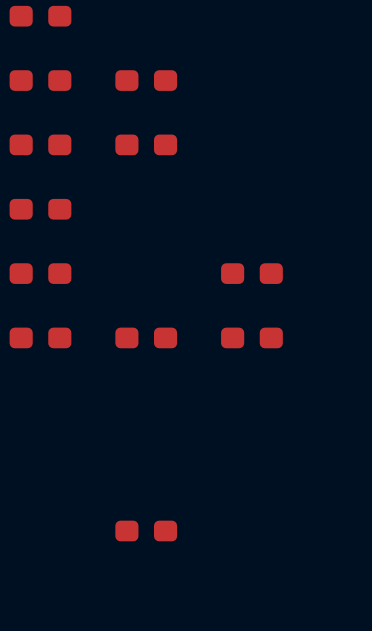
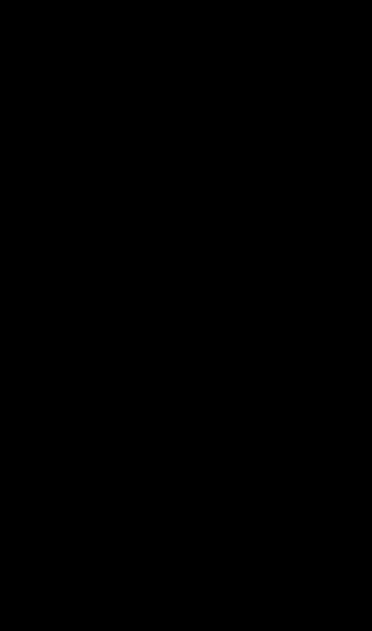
part: (40, 16) -> none
part: (40, 80) -> none
part: (146, 80) -> none
part: (40, 144) -> none
part: (146, 144) -> none
part: (40, 209) -> none
part: (40, 273) -> none
part: (251, 273) -> none
part: (40, 337) -> none
part: (146, 337) -> none
part: (251, 337) -> none
part: (146, 530) -> none

